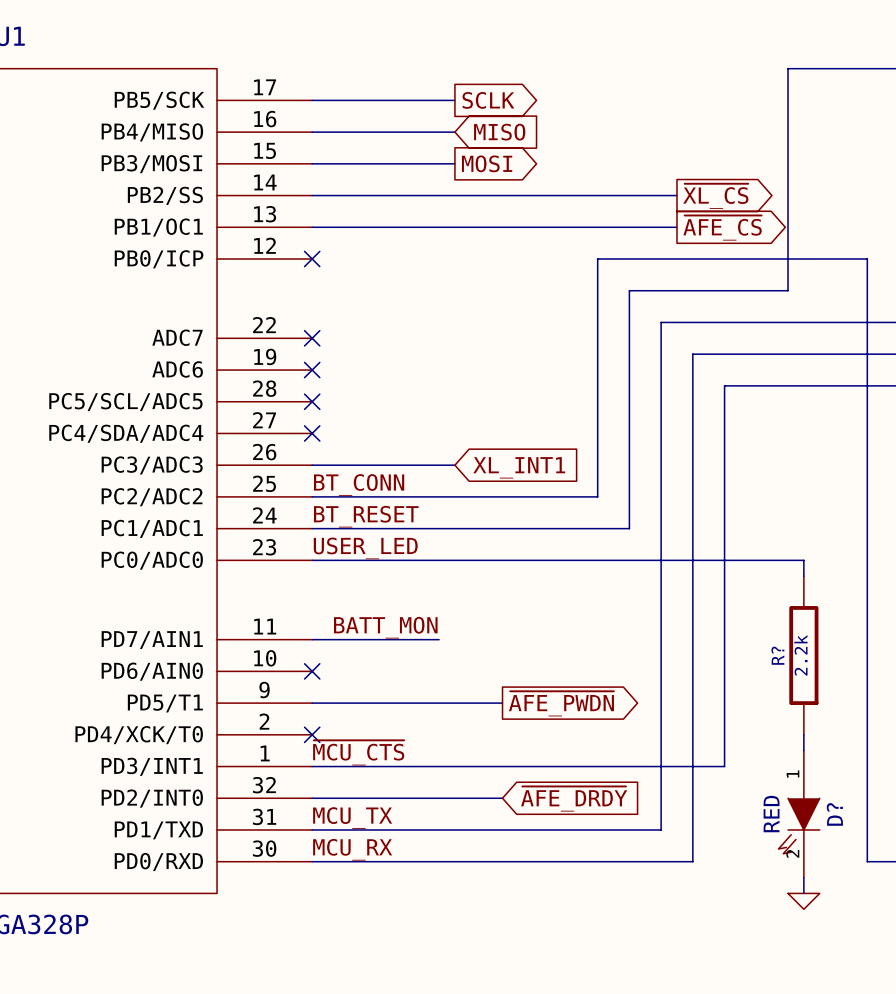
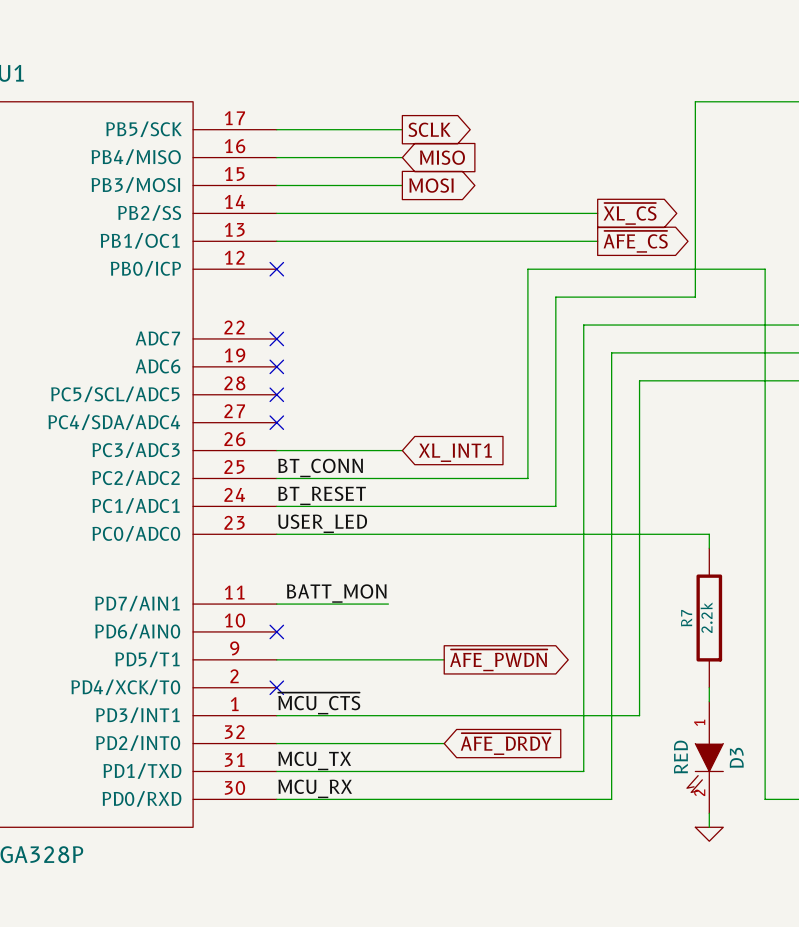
R? name: R? (777, 655) -> R7 (686, 618)
D? name: D? (834, 814) -> D3 (736, 757)

